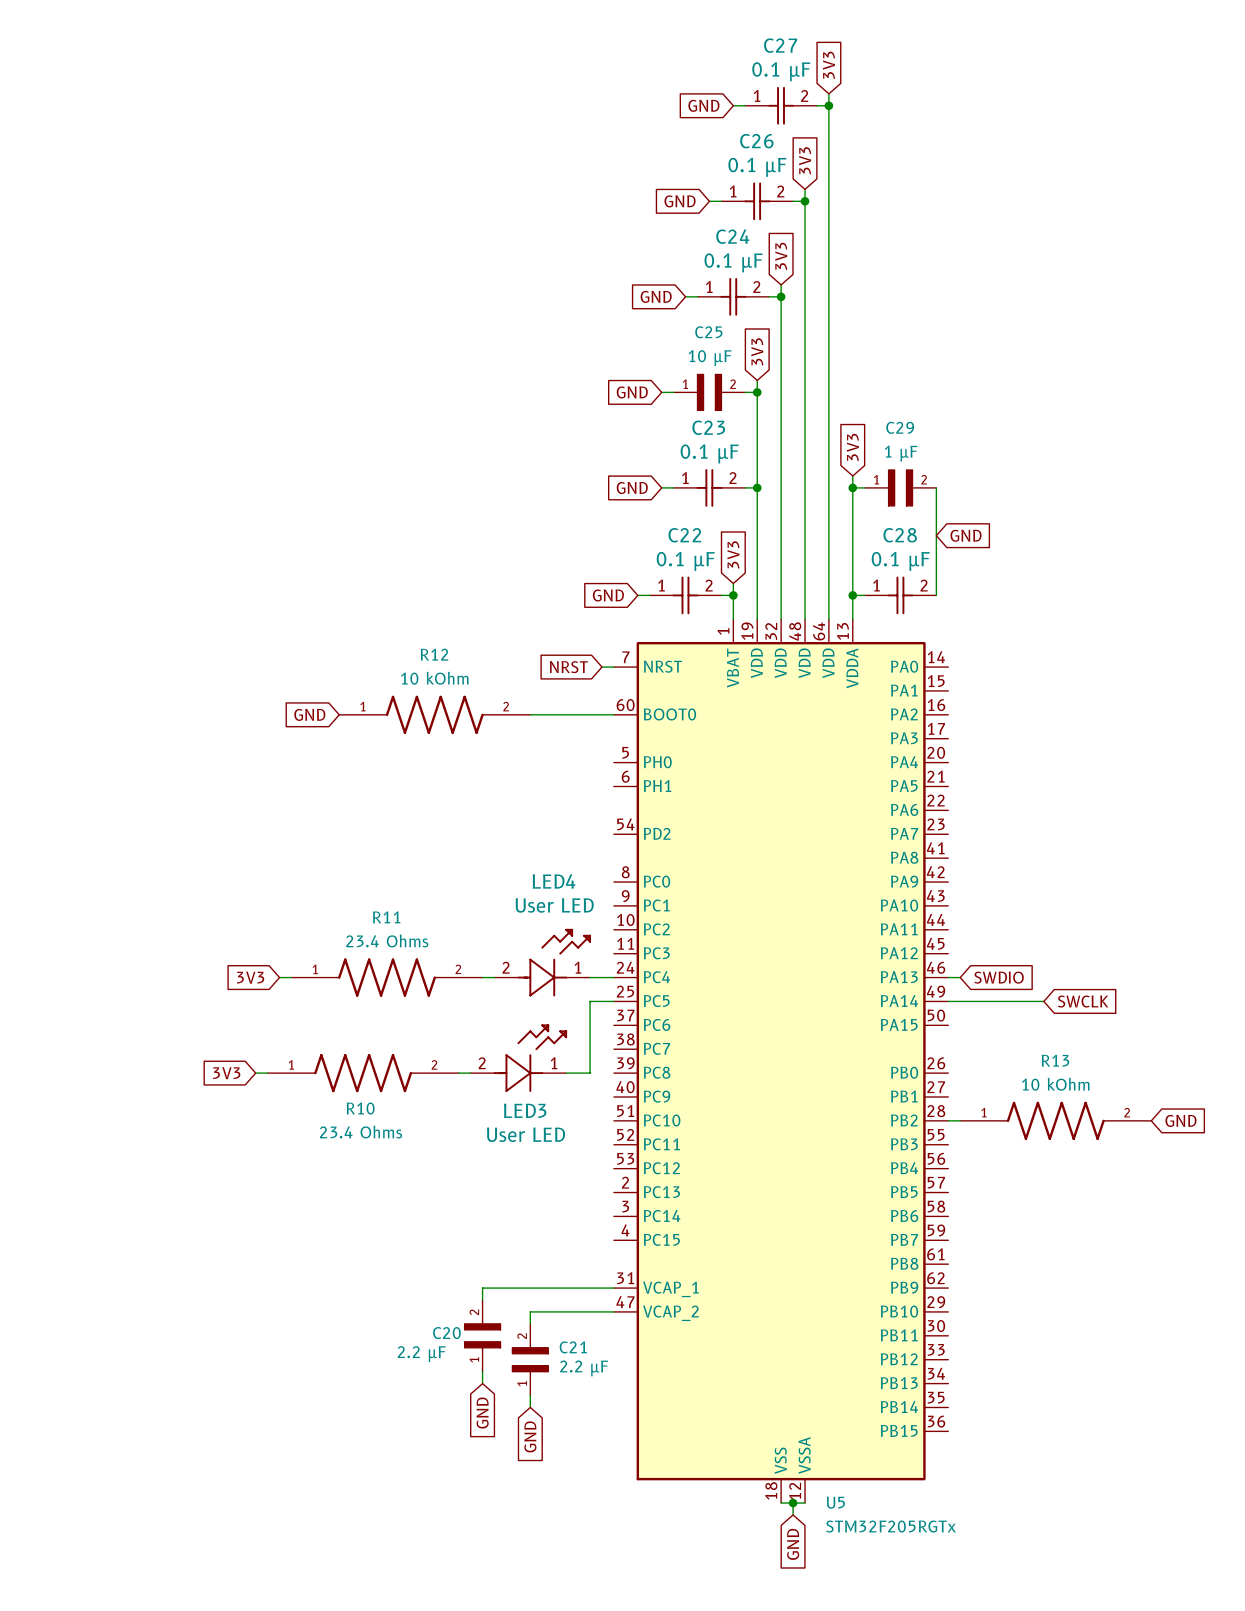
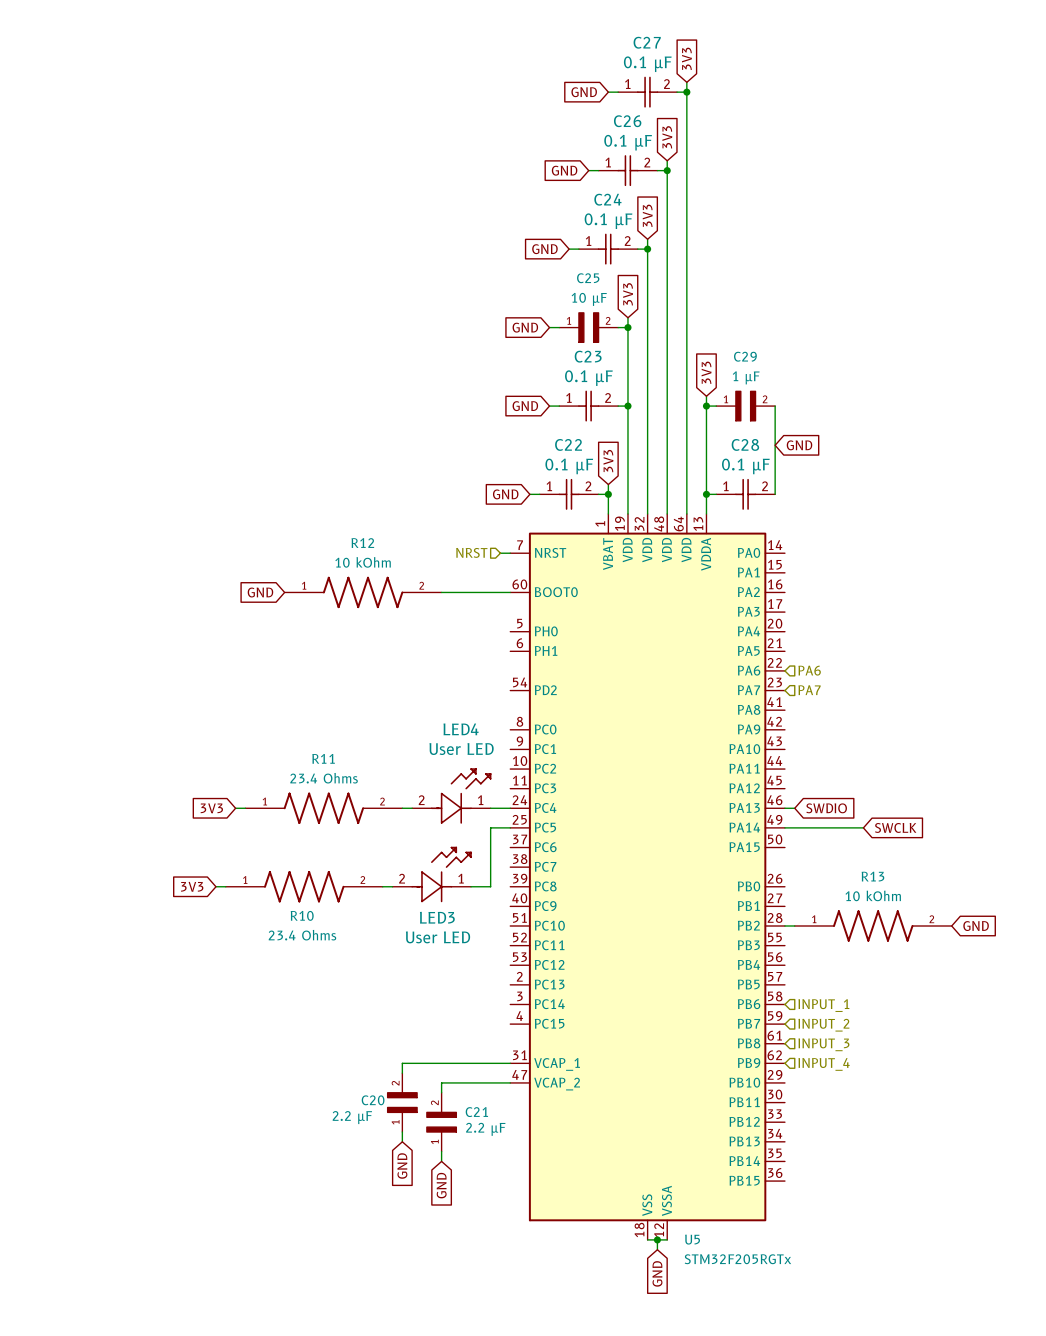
hierarchical label: none -> NRST (471, 552)
global label: NRST (568, 667) -> none
hierarchical label: none -> PA6 (809, 670)
hierarchical label: none -> PA7 (809, 690)
hierarchical label: none -> INPUT_1 (823, 1005)
hierarchical label: none -> INPUT_2 (823, 1025)
hierarchical label: none -> INPUT_3 (823, 1044)
hierarchical label: none -> INPUT_4 (824, 1064)

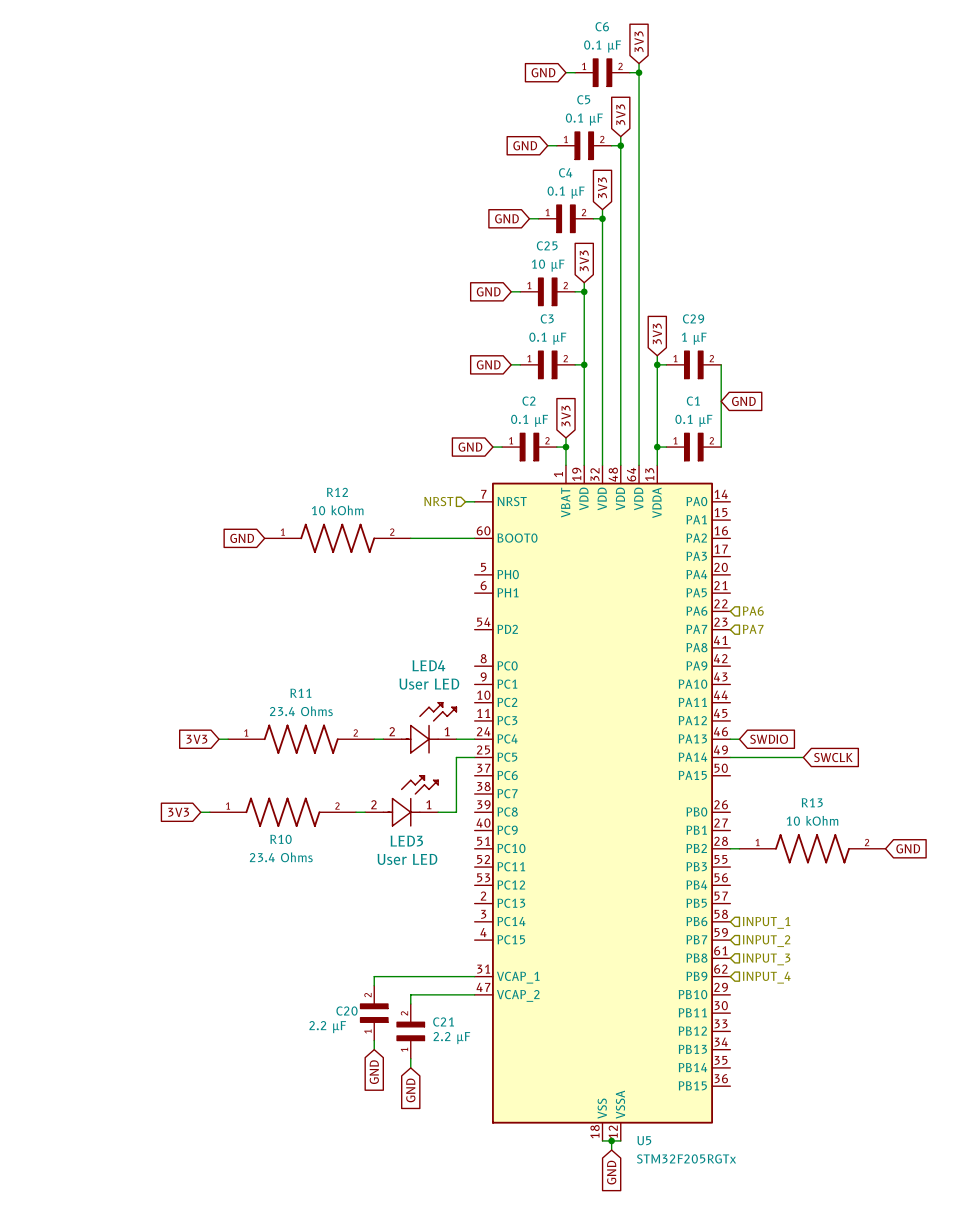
C27: 0.1 µF (647, 92) -> none
C6: none -> 0.1 µF (602, 72)
C26: 0.1 µF (627, 170) -> none
C5: none -> 0.1 µF (584, 145)
C24: 0.1 µF (608, 249) -> none
C4: none -> 0.1 µF (565, 218)
C23: 0.1 µF (588, 406) -> none
C3: none -> 0.1 µF (547, 364)
C22: 0.1 µF (569, 494) -> none
C2: none -> 0.1 µF (529, 447)
C28: 0.1 µF (745, 494) -> none
C1: none -> 0.1 µF (693, 447)

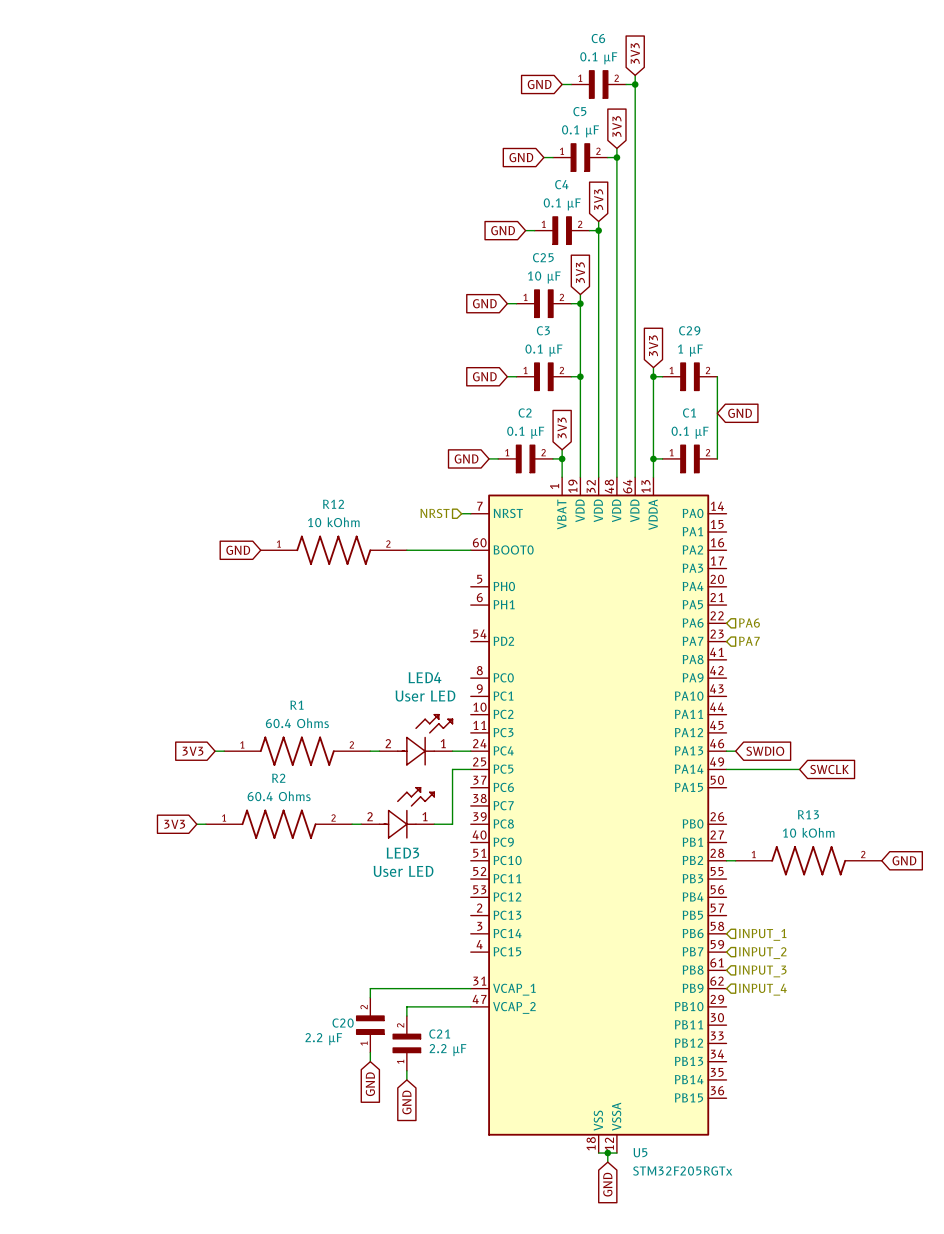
R11 name: R11 (300, 693) -> R1 (296, 705)
R11 value: 23.4 Ohms (301, 711) -> 60.4 Ohms (297, 723)
R10 name: R10 (281, 839) -> R2 (278, 778)
R10 value: 23.4 Ohms (281, 857) -> 60.4 Ohms (279, 796)

